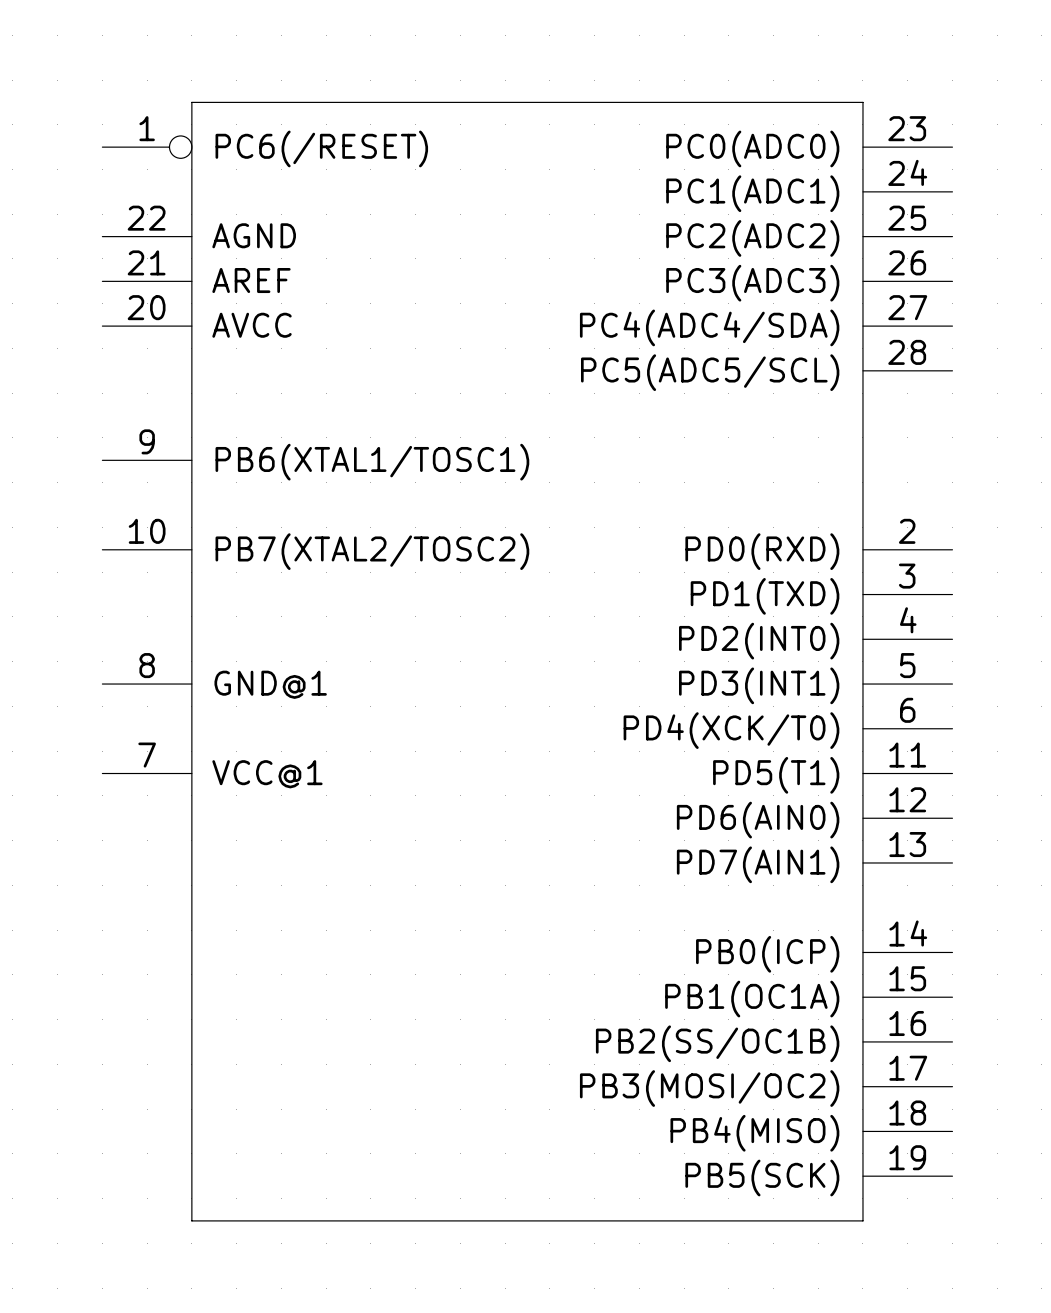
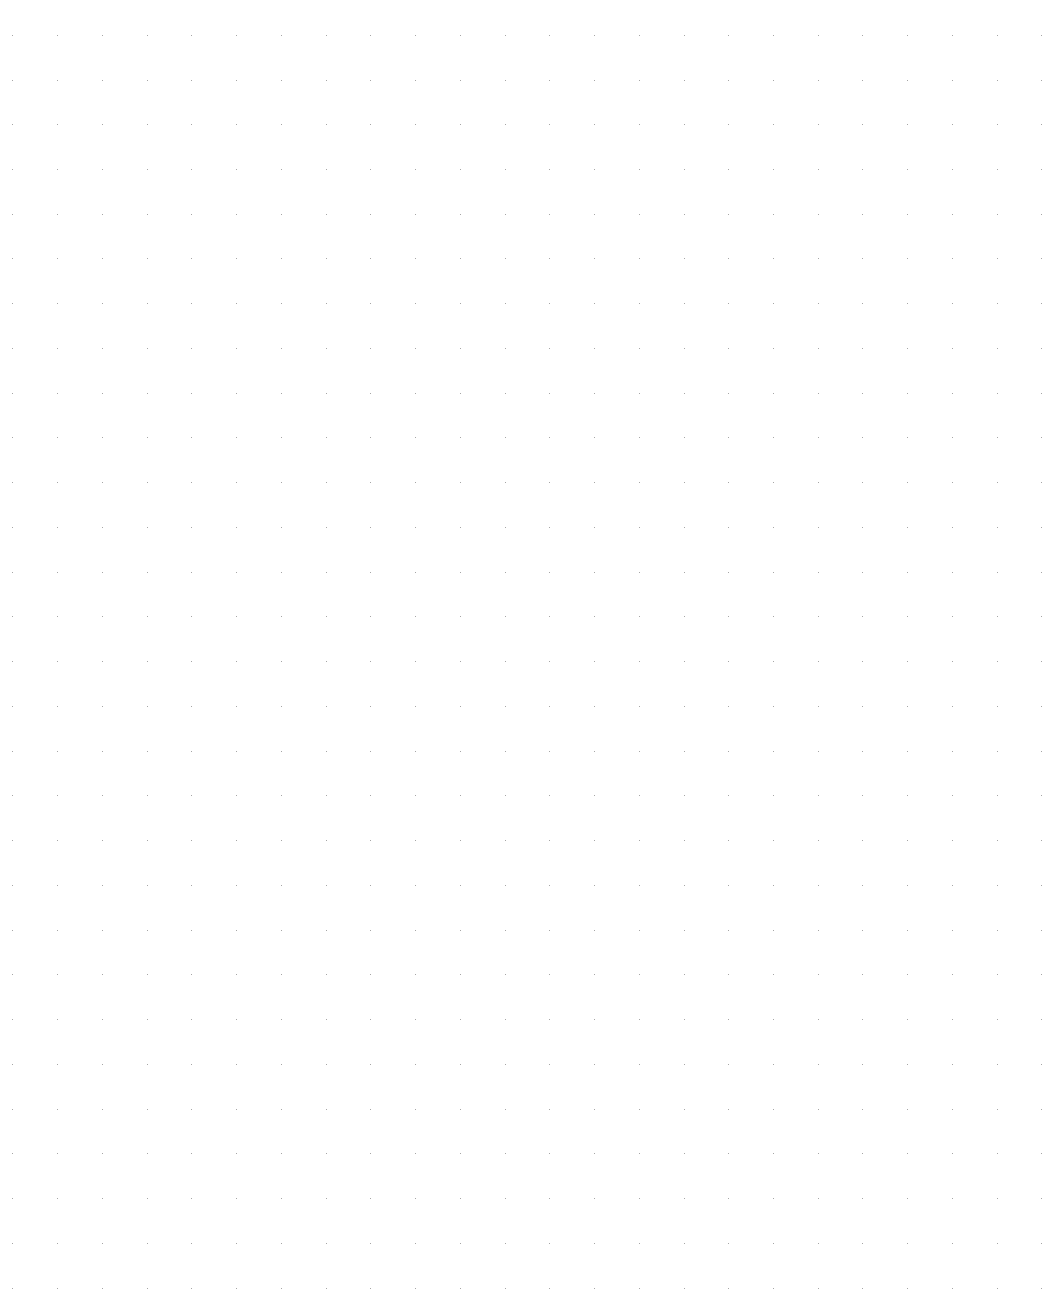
part: (527, 661) -> none

